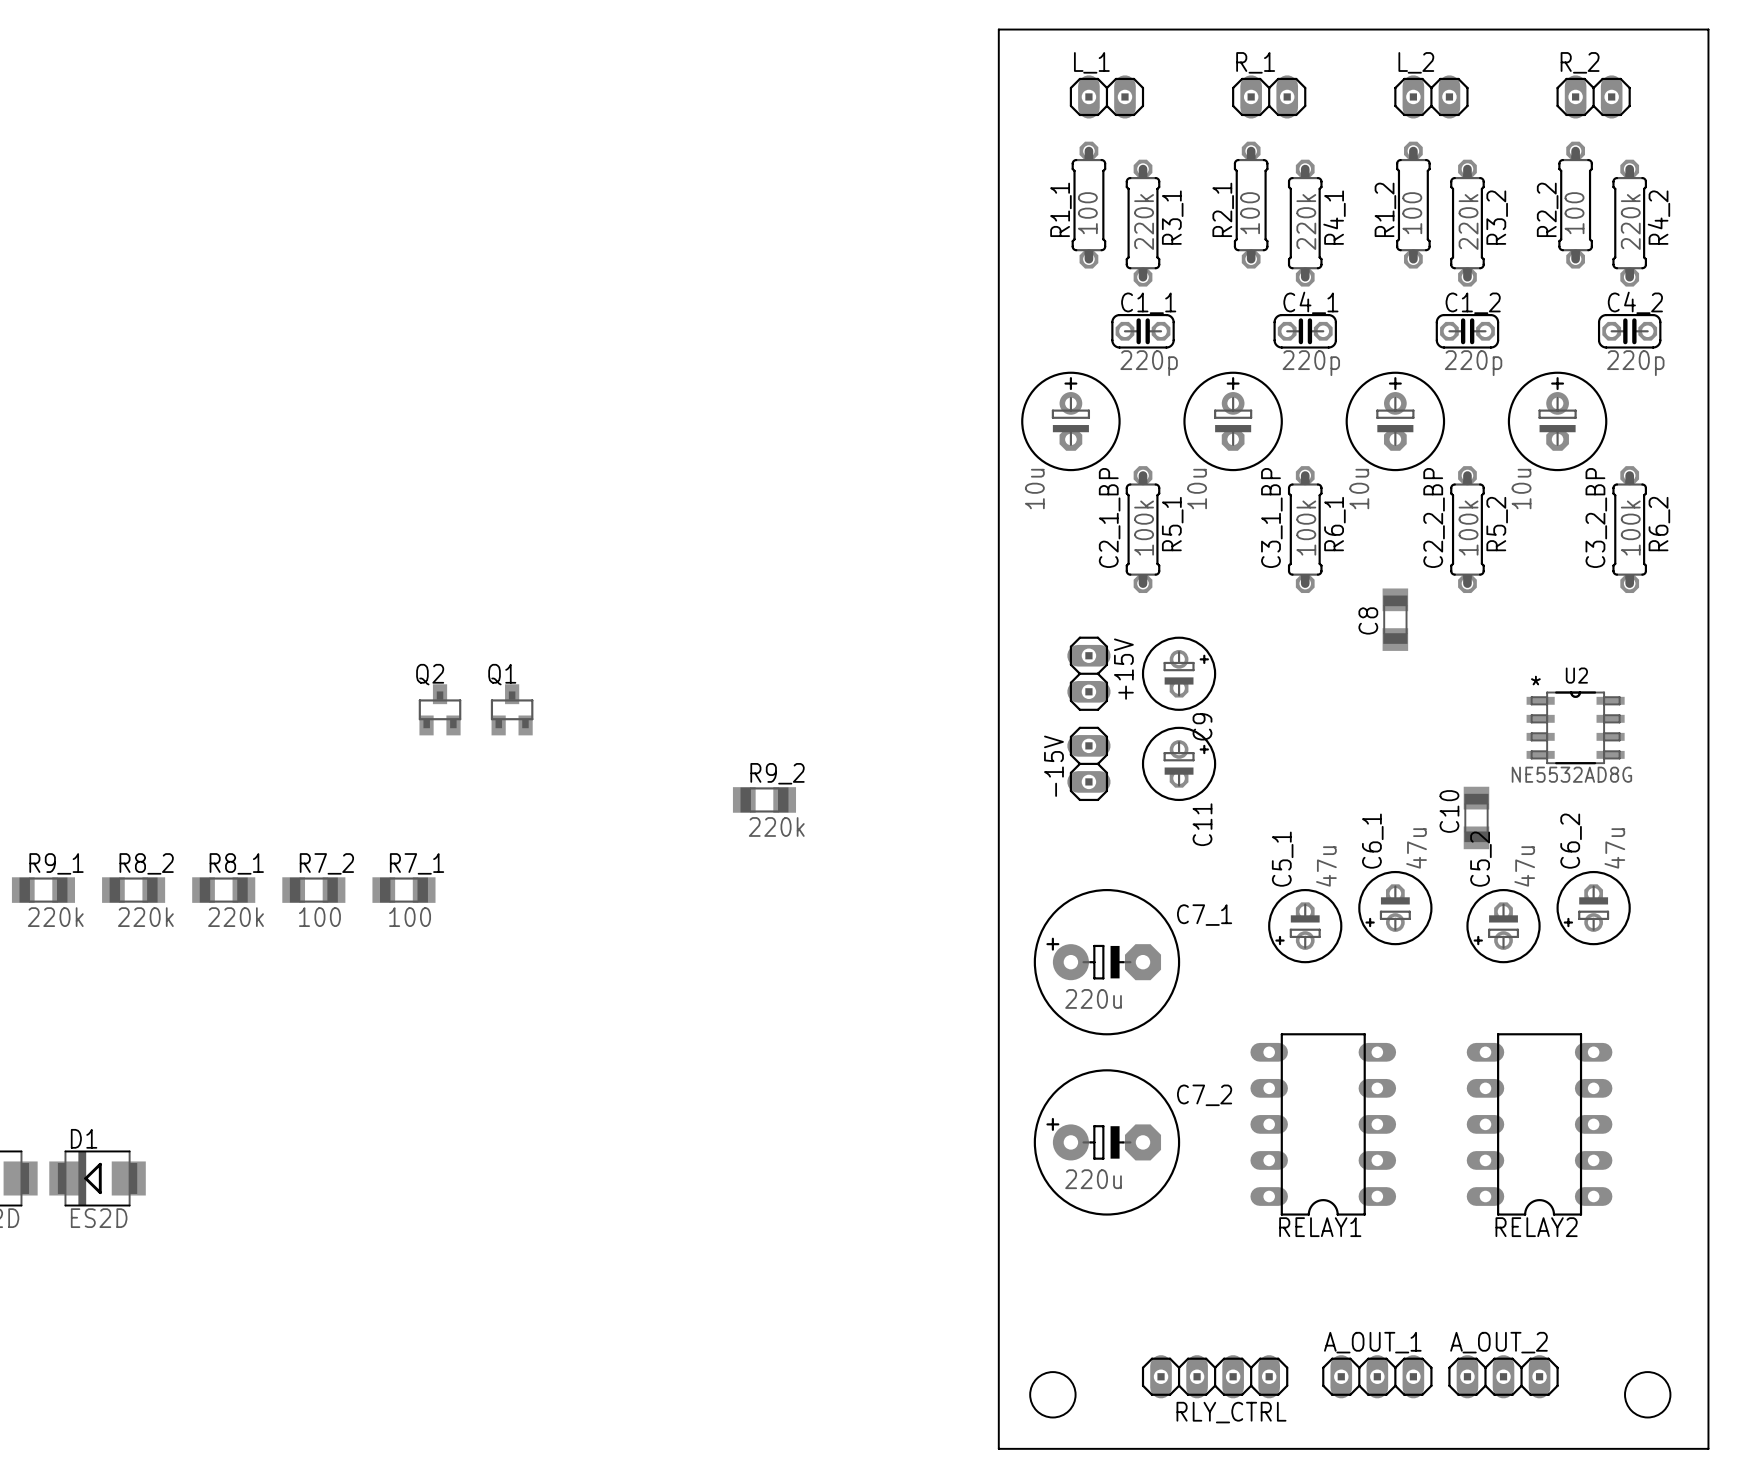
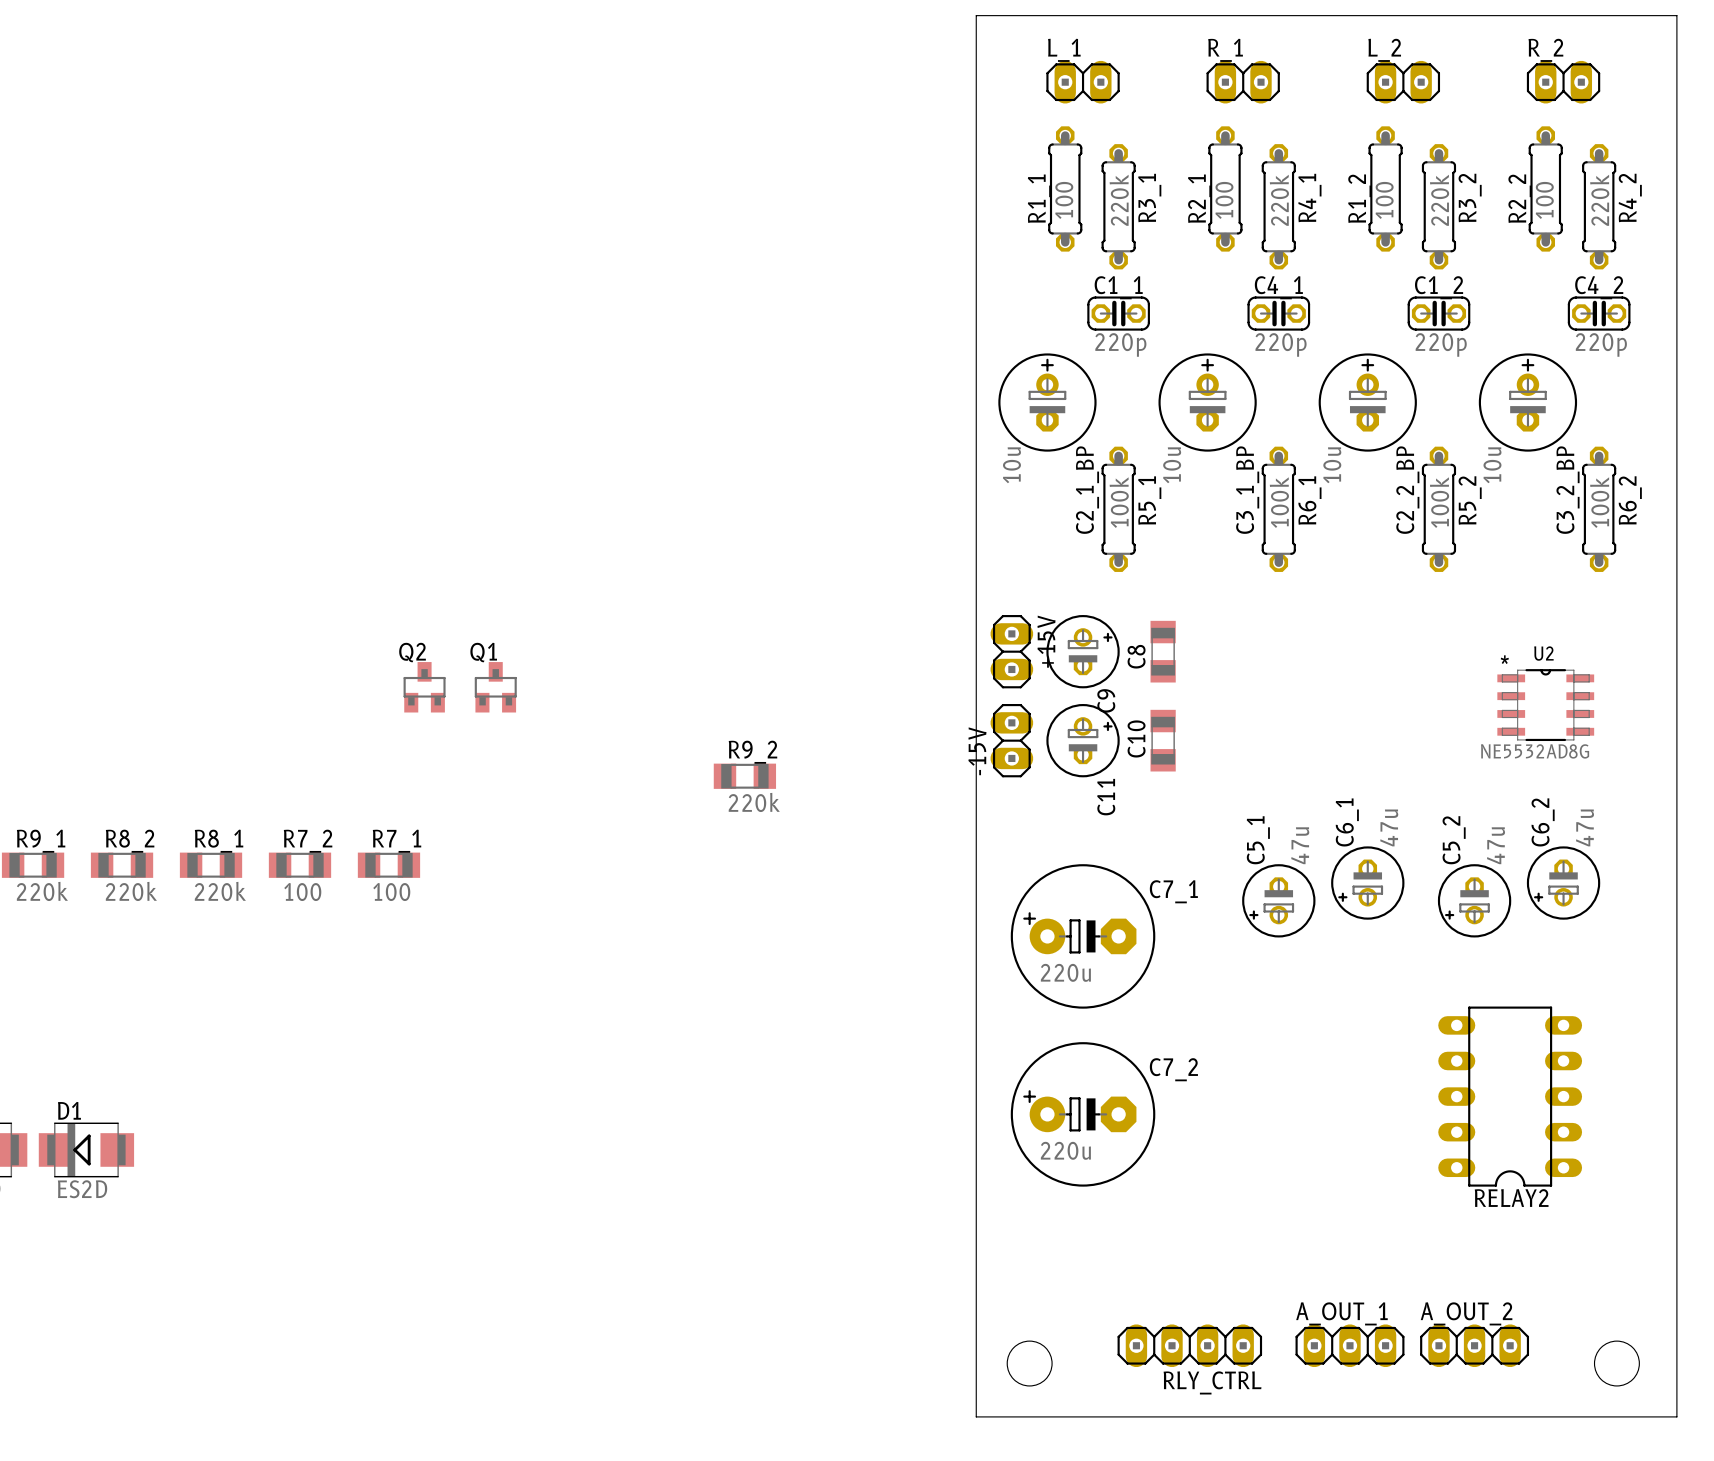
C8 position: (1395, 619) -> (1163, 651)
+15V position: (1088, 673) -> (1011, 651)
C9 position: (1179, 673) -> (1083, 651)
-15V position: (1088, 763) -> (1011, 740)
C11 position: (1179, 763) -> (1083, 740)
C10 position: (1476, 817) -> (1163, 740)
RELAY1: (1323, 1124) -> none

